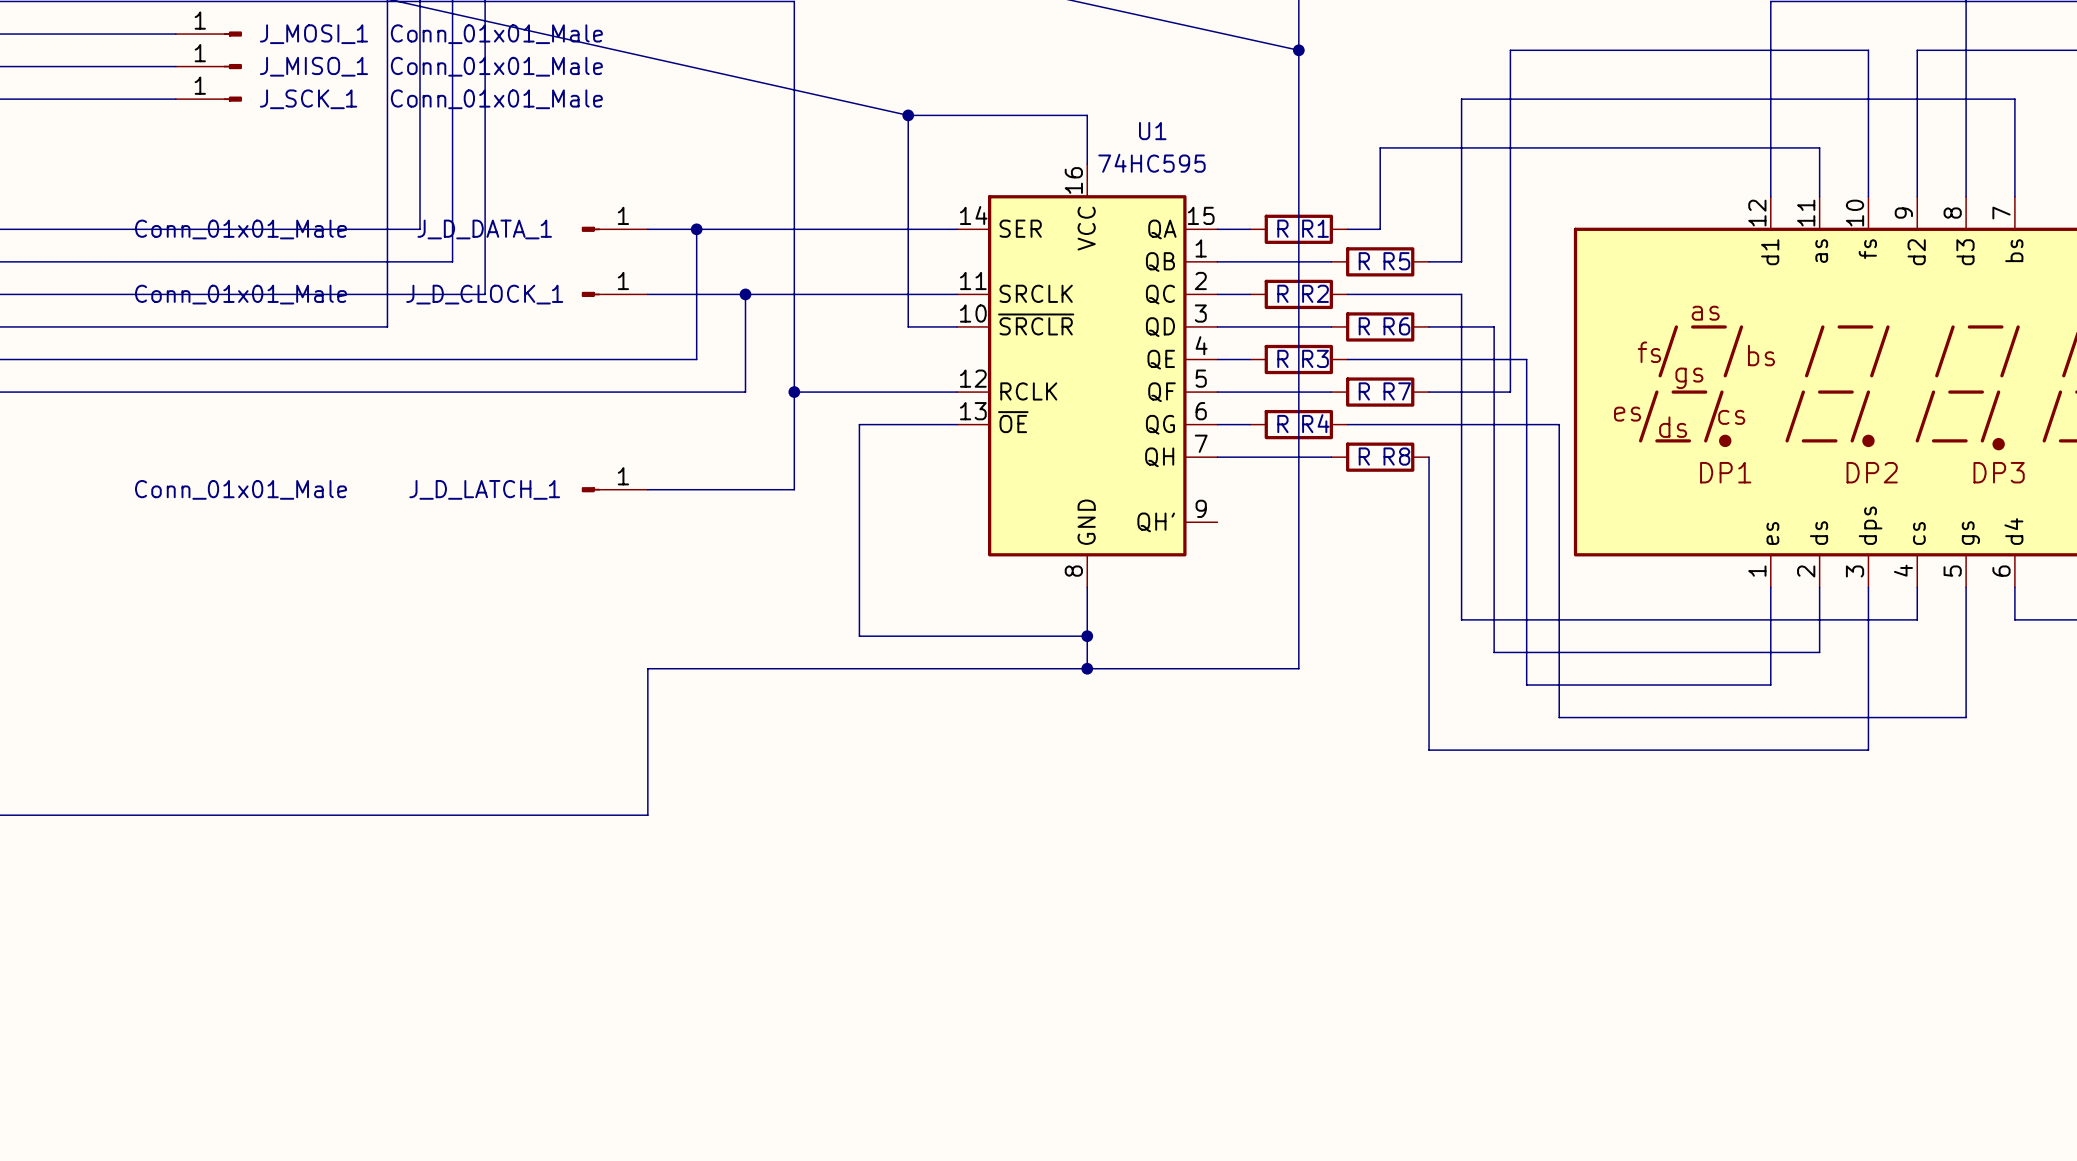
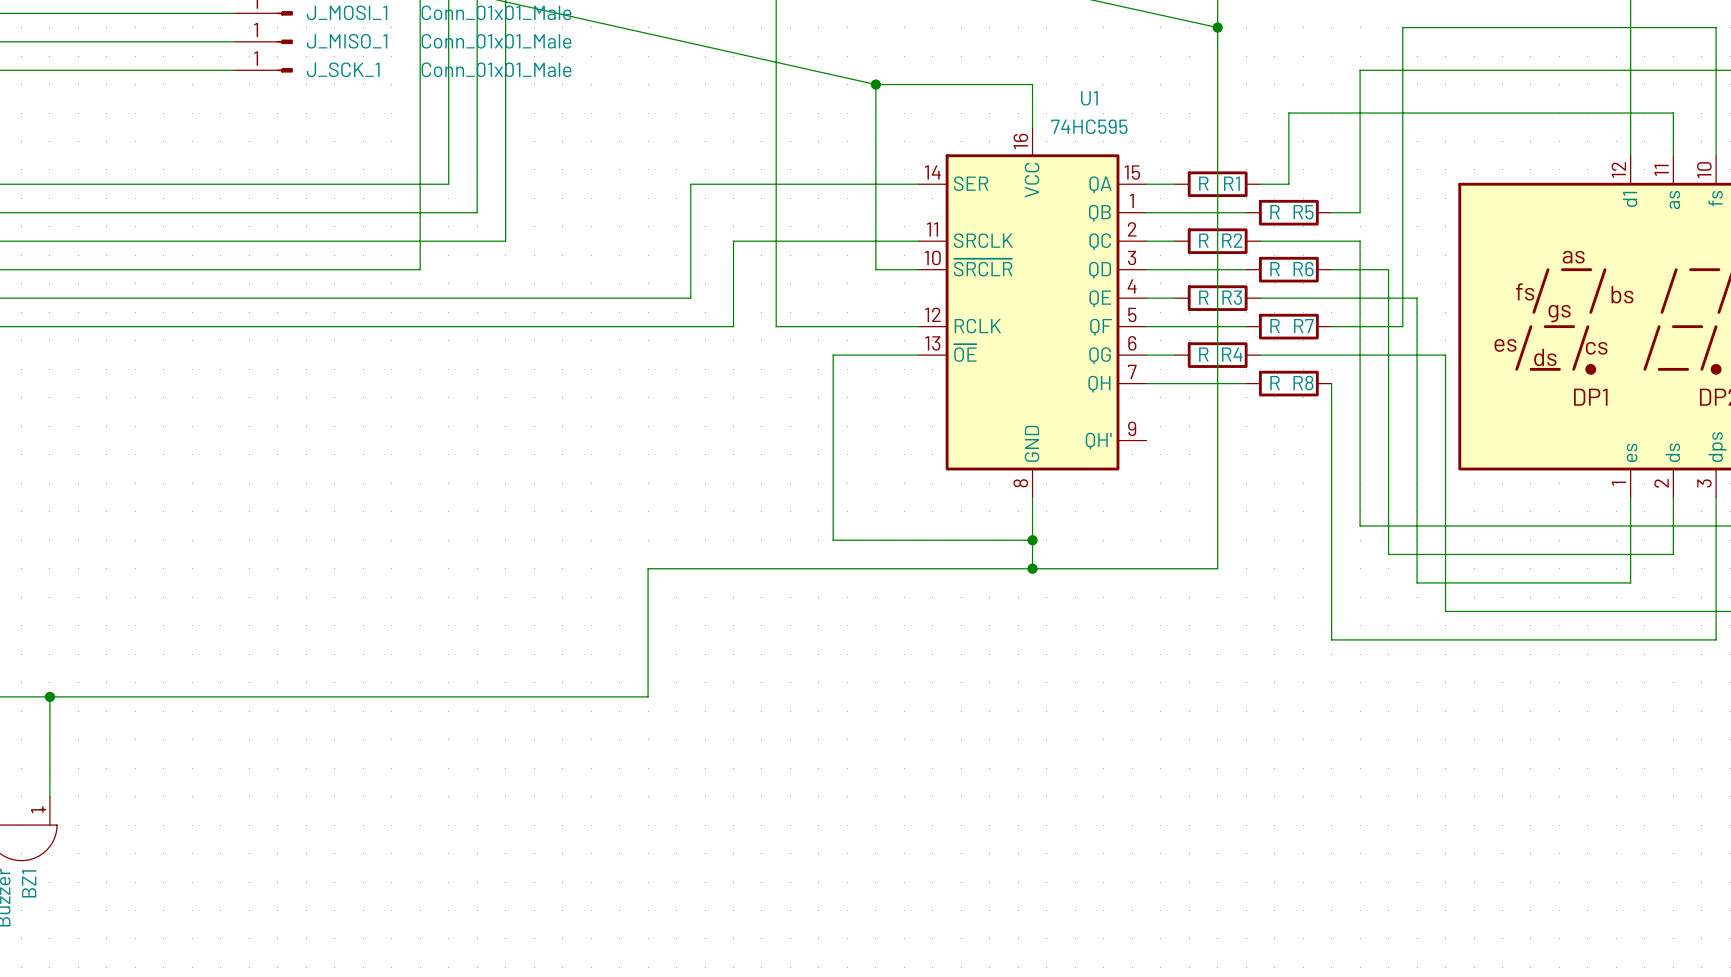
J_D_DATA_1: Conn_01x01_Male (614, 229) -> none
wire: (647, 229) (696, 229) -> none
junction: (696, 229) -> none
J_D_CLOCK_1: Conn_01x01_Male (614, 294) -> none
wire: (647, 294) (745, 294) -> none
junction: (745, 294) -> none
wire: (794, 392) (794, 489) (647, 489) -> none
junction: (794, 392) -> none
J_D_LATCH_1: Conn_01x01_Male (614, 489) -> none

